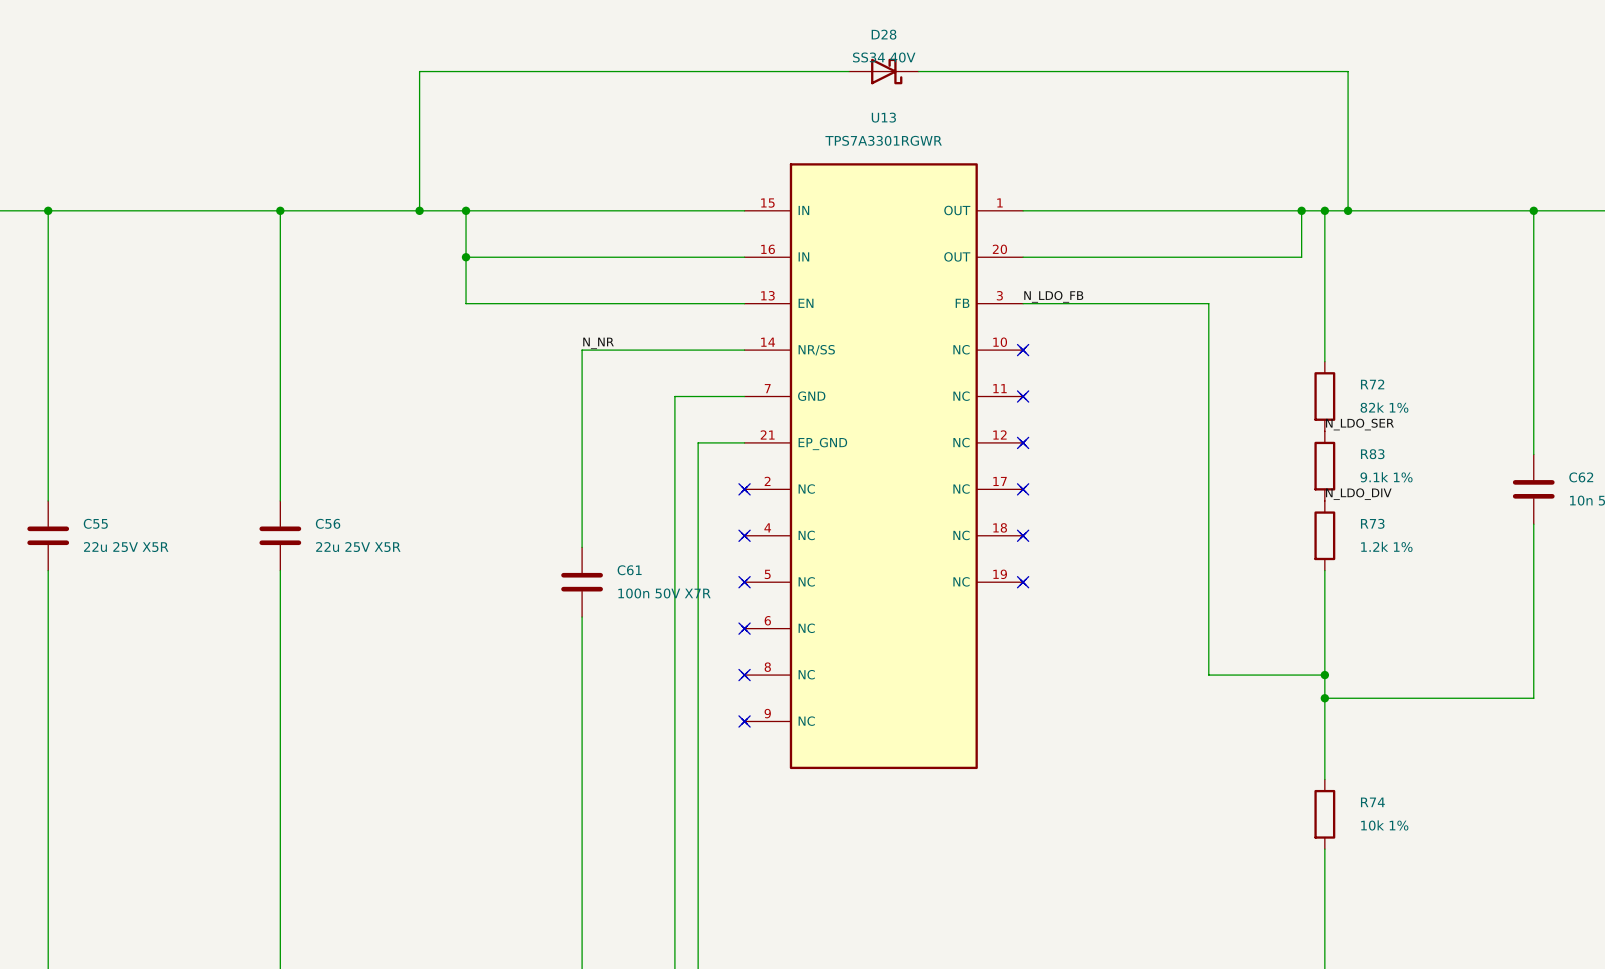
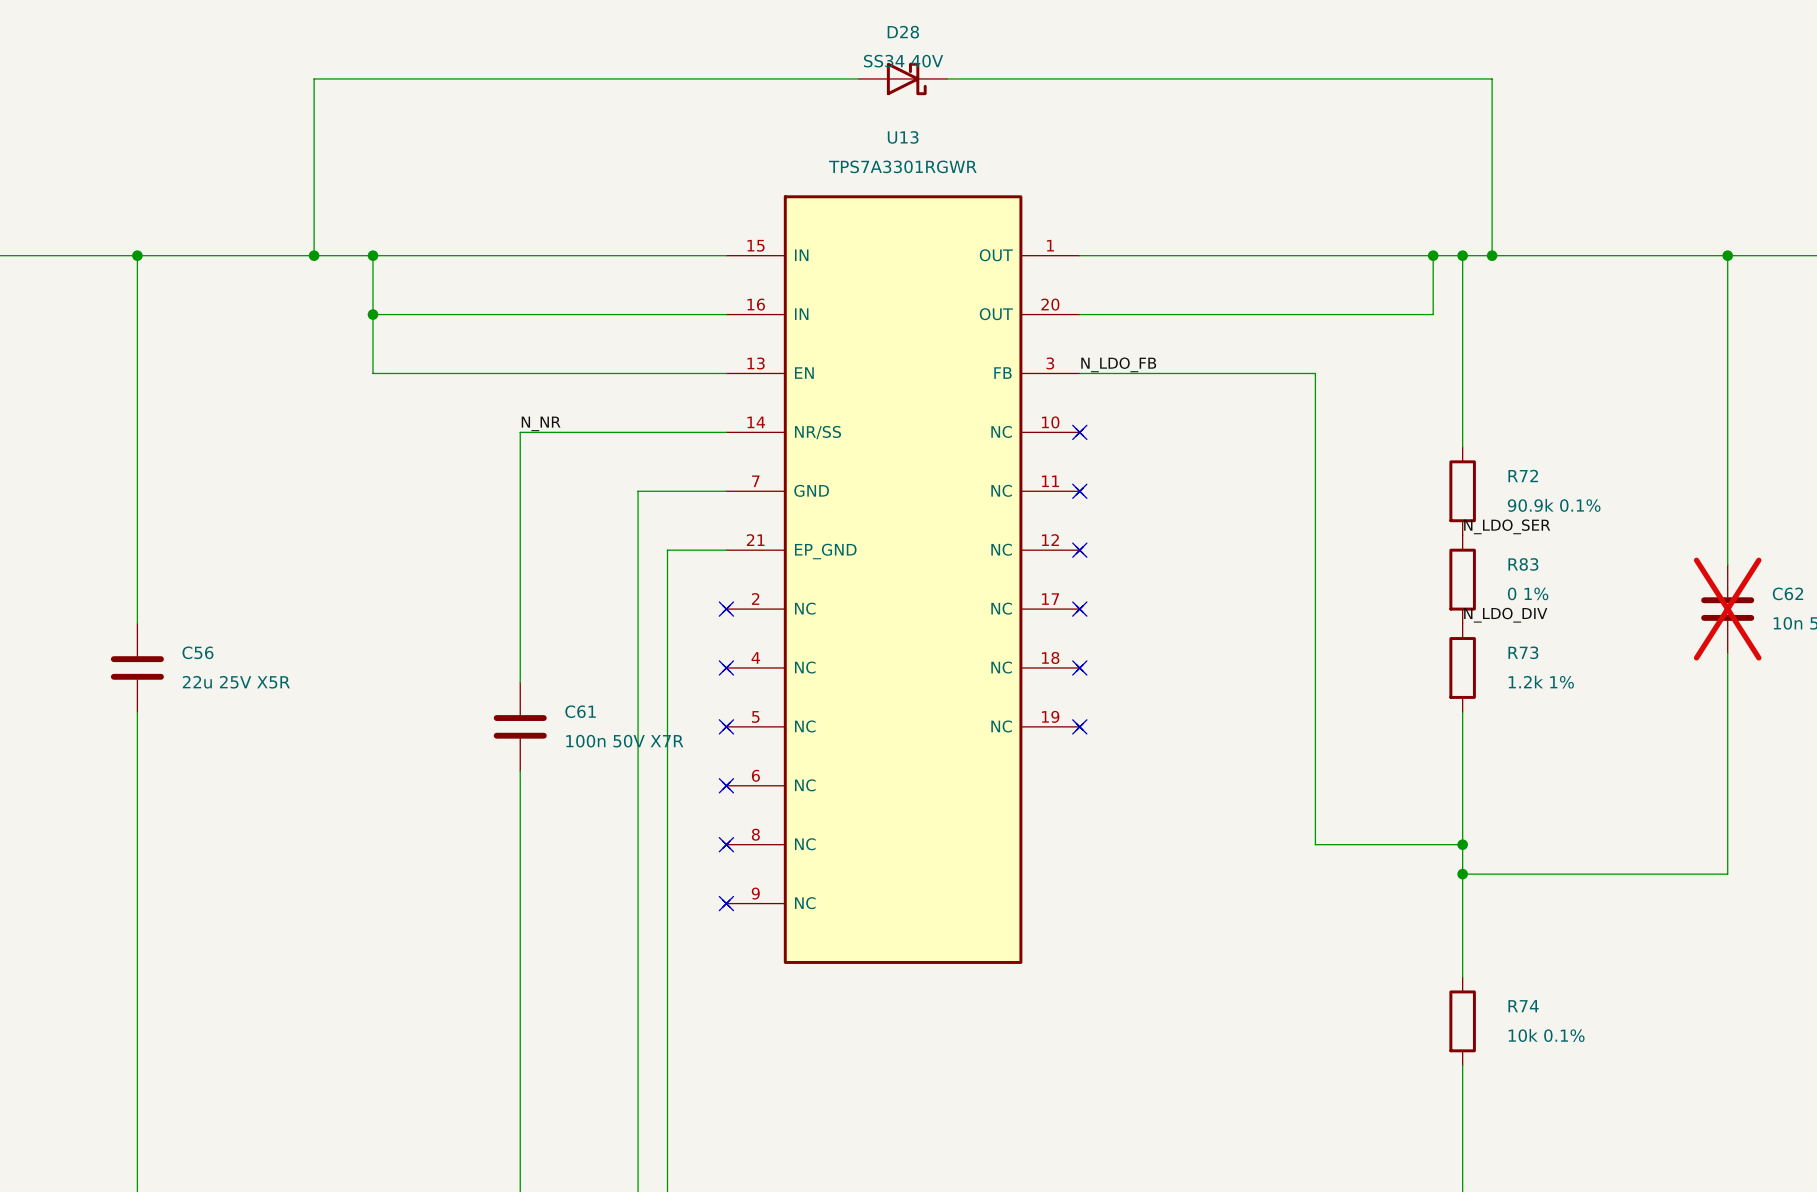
R72 value: 82k 1% (1384, 407) -> 90.9k 0.1% (1554, 505)
R83 value: 9.1k 1% (1386, 477) -> 0 1% (1528, 593)
C62 do-not-place cross: none -> (1727, 609)
R74 value: 10k 1% (1384, 825) -> 10k 0.1% (1546, 1035)

